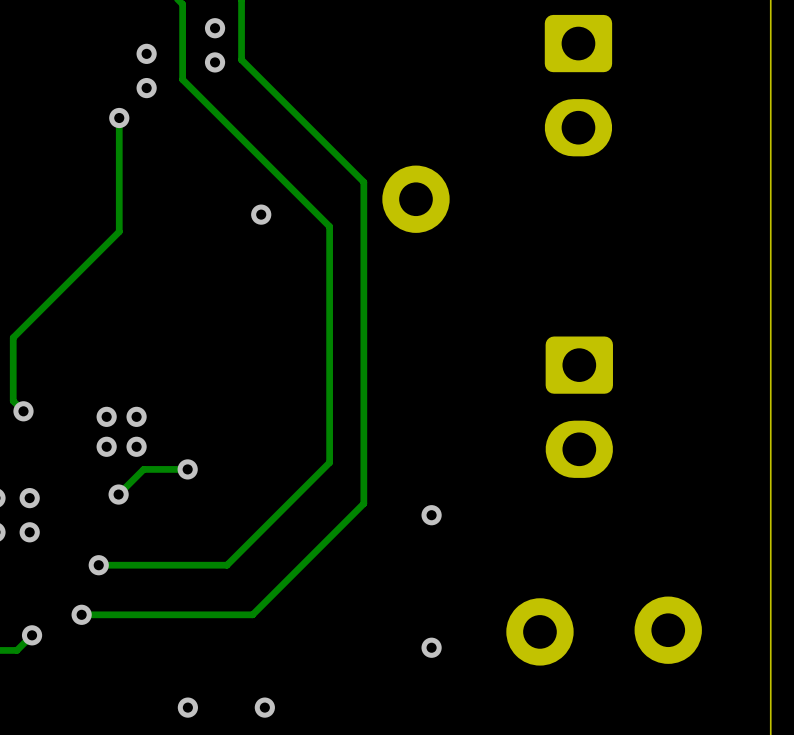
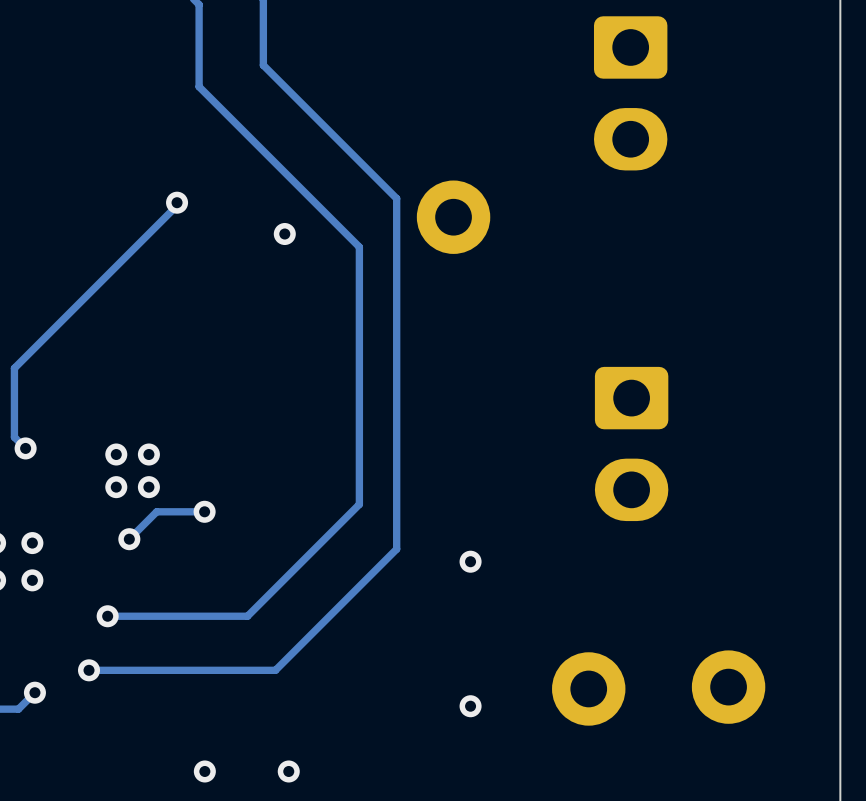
via: (215, 28) -> none
via: (146, 53) -> none
via: (215, 62) -> none
via: (146, 88) -> none
track: (119, 118) (119, 231) -> (177, 202) (177, 205) (130, 252)
via: (119, 118) -> none
via: none -> (177, 202)

